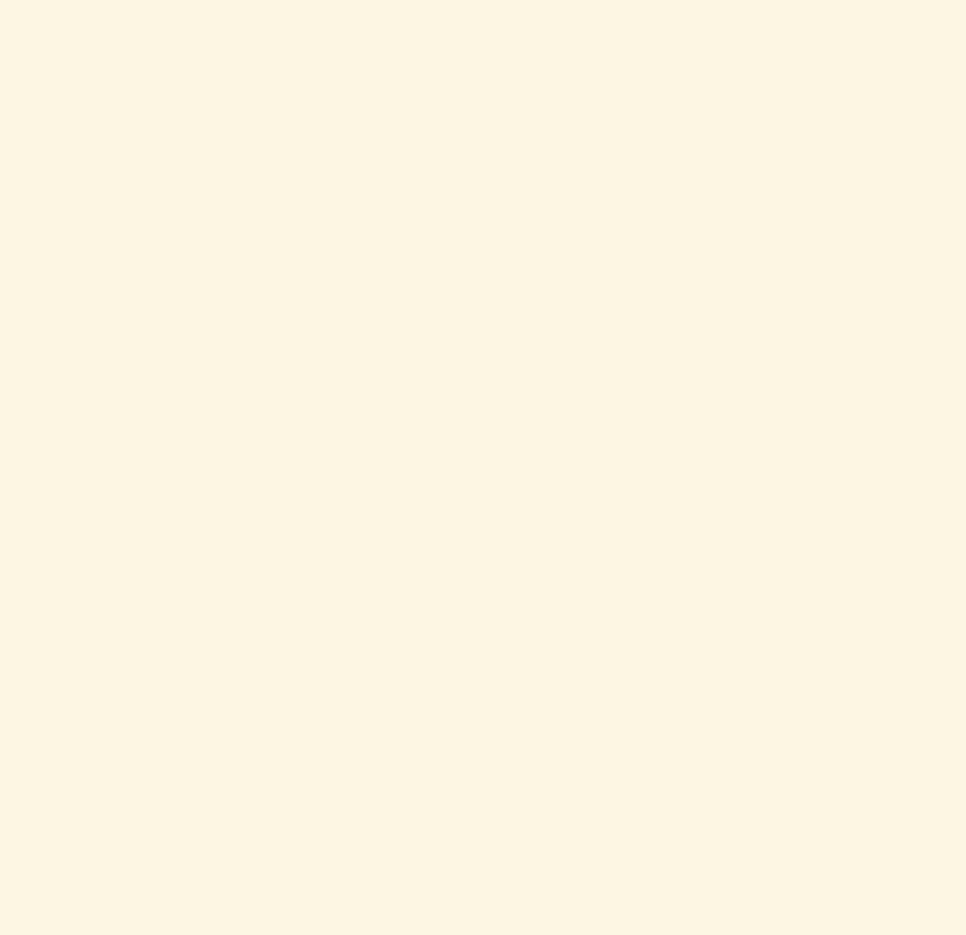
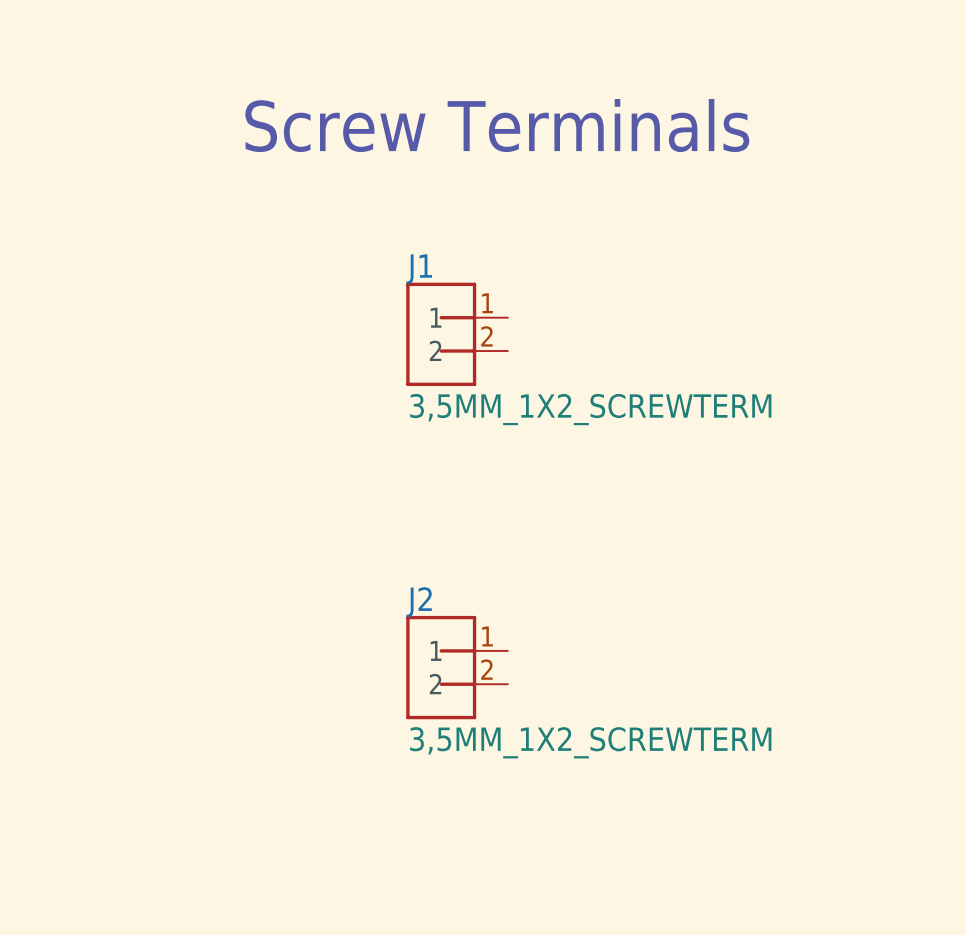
text: none -> Screw Terminals (497, 125)
J1: none -> 3,5MM_1X2_SCREWTERM (457, 334)
J2: none -> 3,5MM_1X2_SCREWTERM (457, 667)

